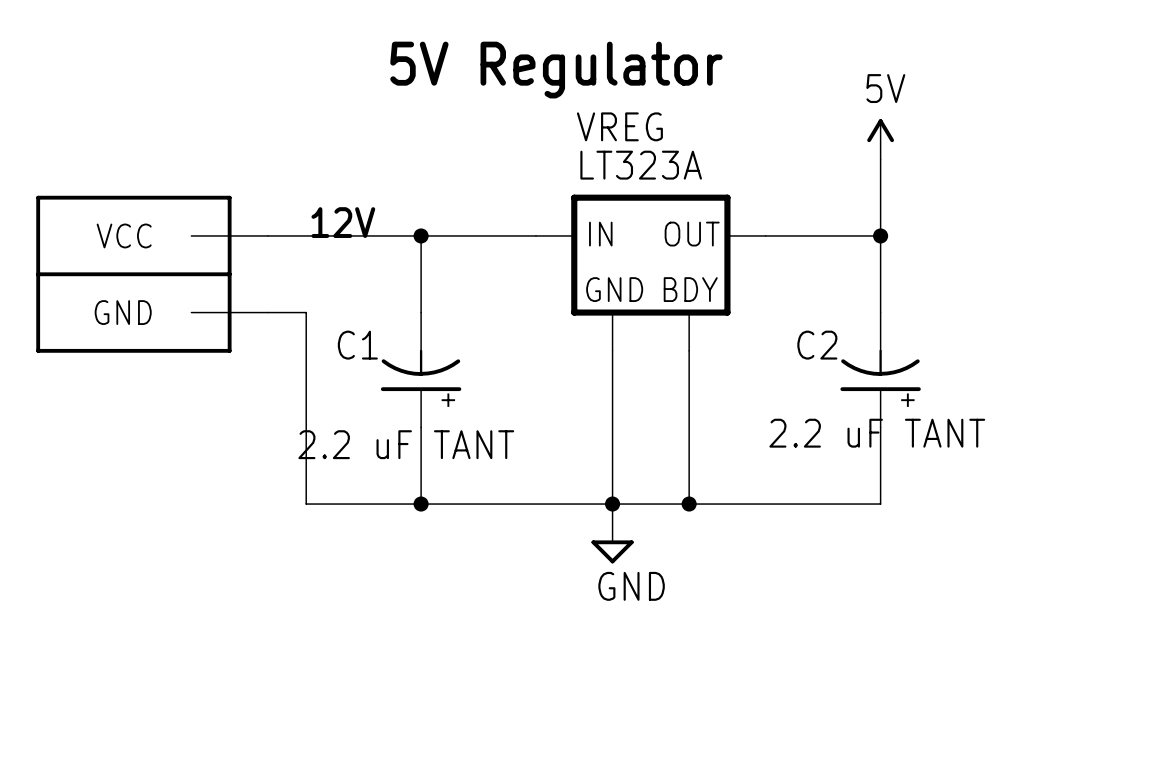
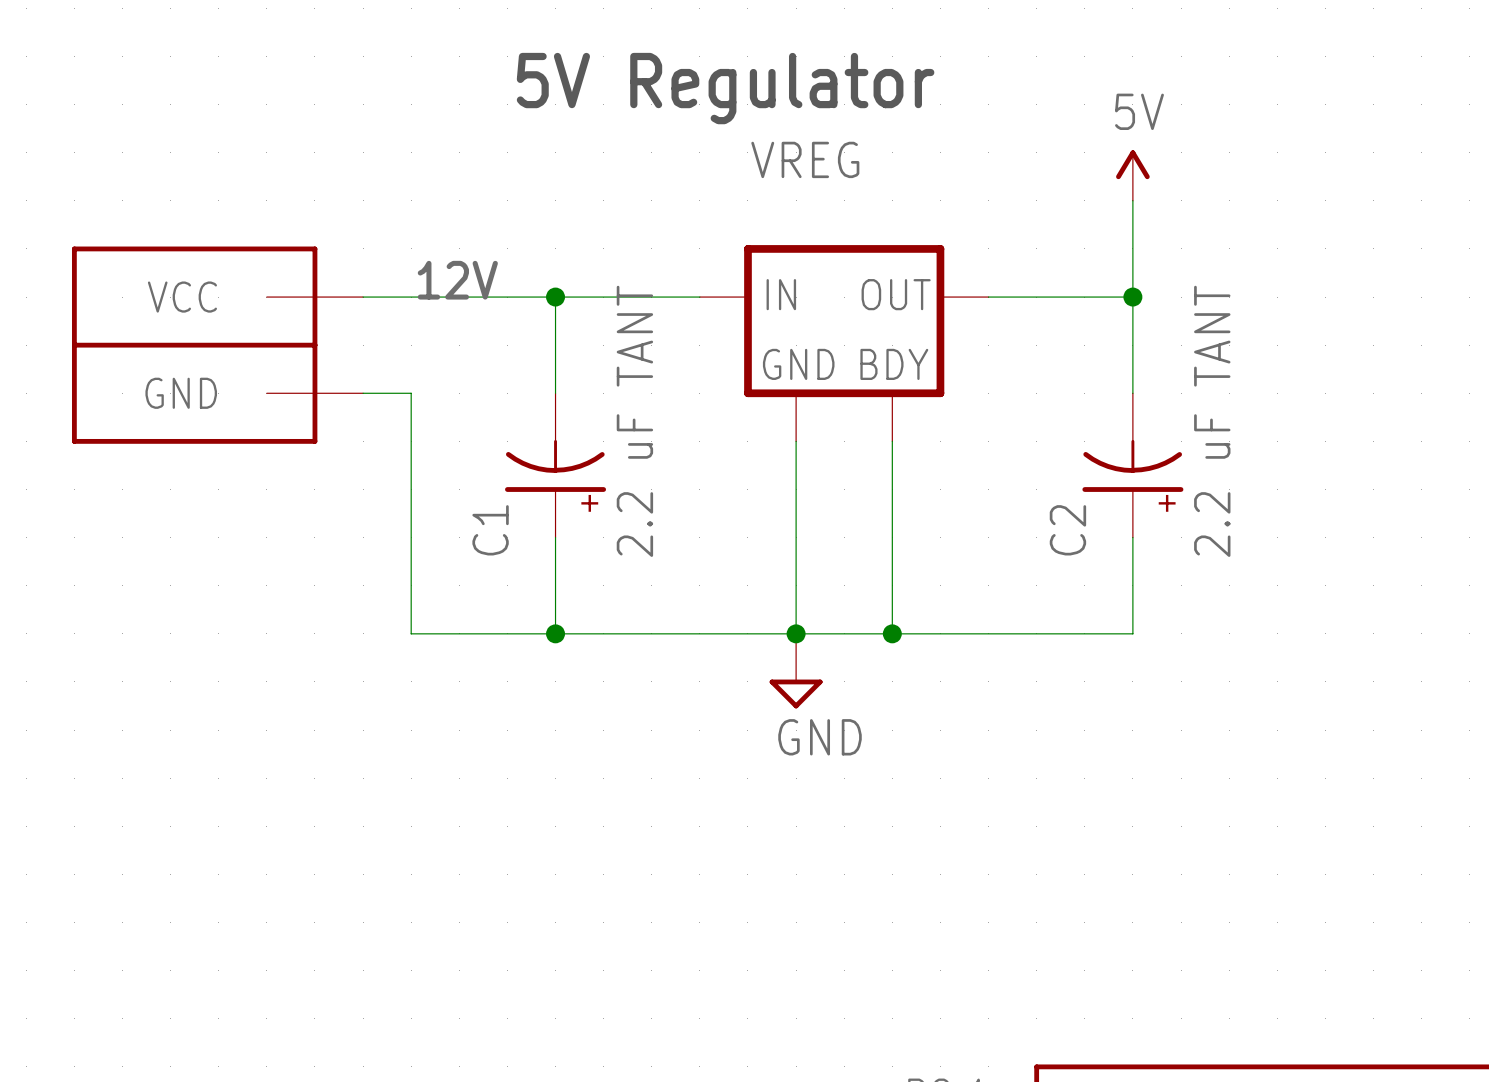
VREG value: LT323A (641, 165) -> none
C1 name rotation: 0° (357, 345) -> 90° counterclockwise (490, 530)
C1 name position: C1 (357, 345) -> C1 (490, 530)
C2 name rotation: 0° (817, 345) -> 90° counterclockwise (1067, 530)
C2 name position: C2 (817, 345) -> C2 (1067, 530)
C2 value rotation: 0° (877, 433) -> 90° counterclockwise (1212, 421)
C1 value rotation: 0° (406, 444) -> 90° counterclockwise (634, 421)

